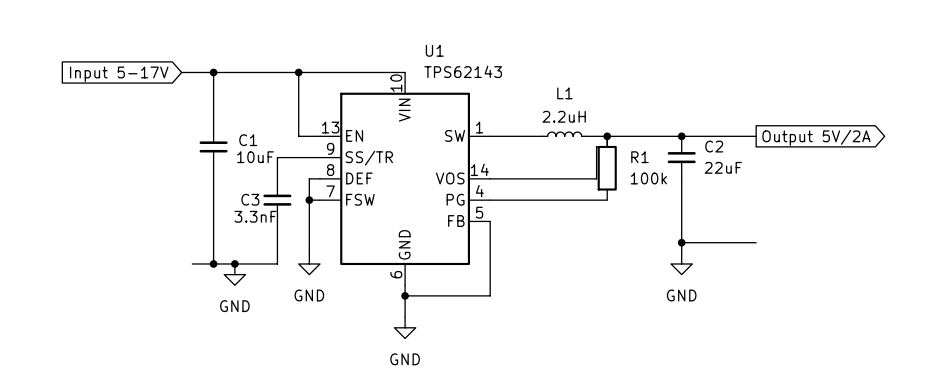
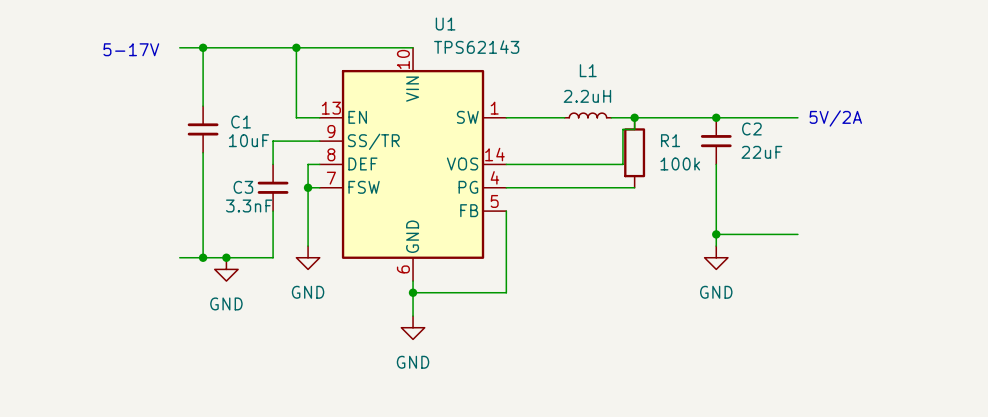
wire: (181, 72) (192, 72) -> none
global label: Input 5-17V (119, 74) -> none
text: none -> 5-17V (131, 49)
text: none -> 5V/2A (835, 118)
global label: Output 5V/2A (816, 137) -> none

